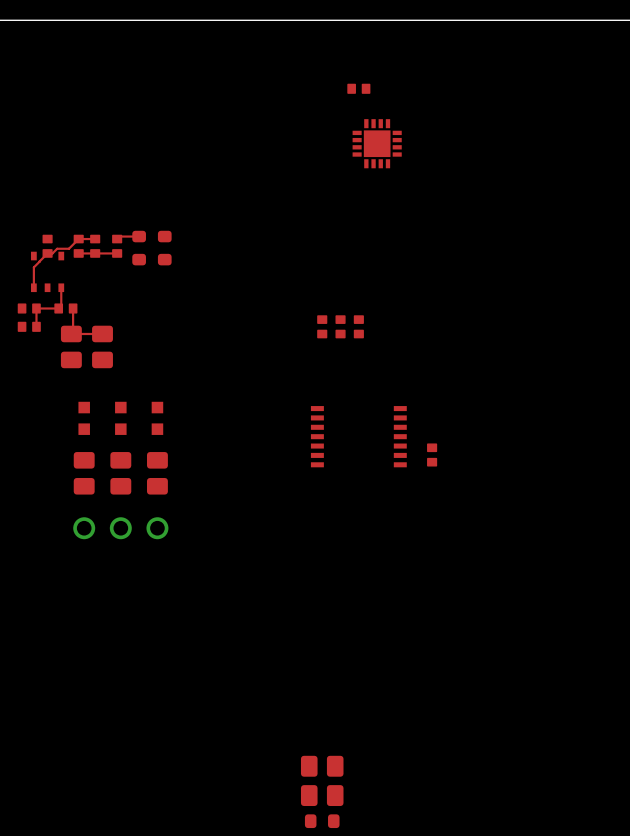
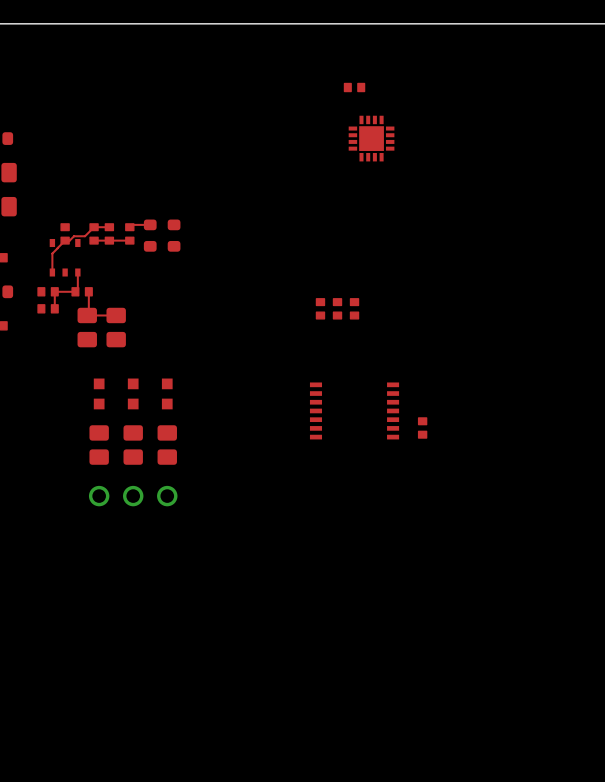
part: (322, 766) -> none
part: (322, 795) -> none
part: (322, 821) -> none

